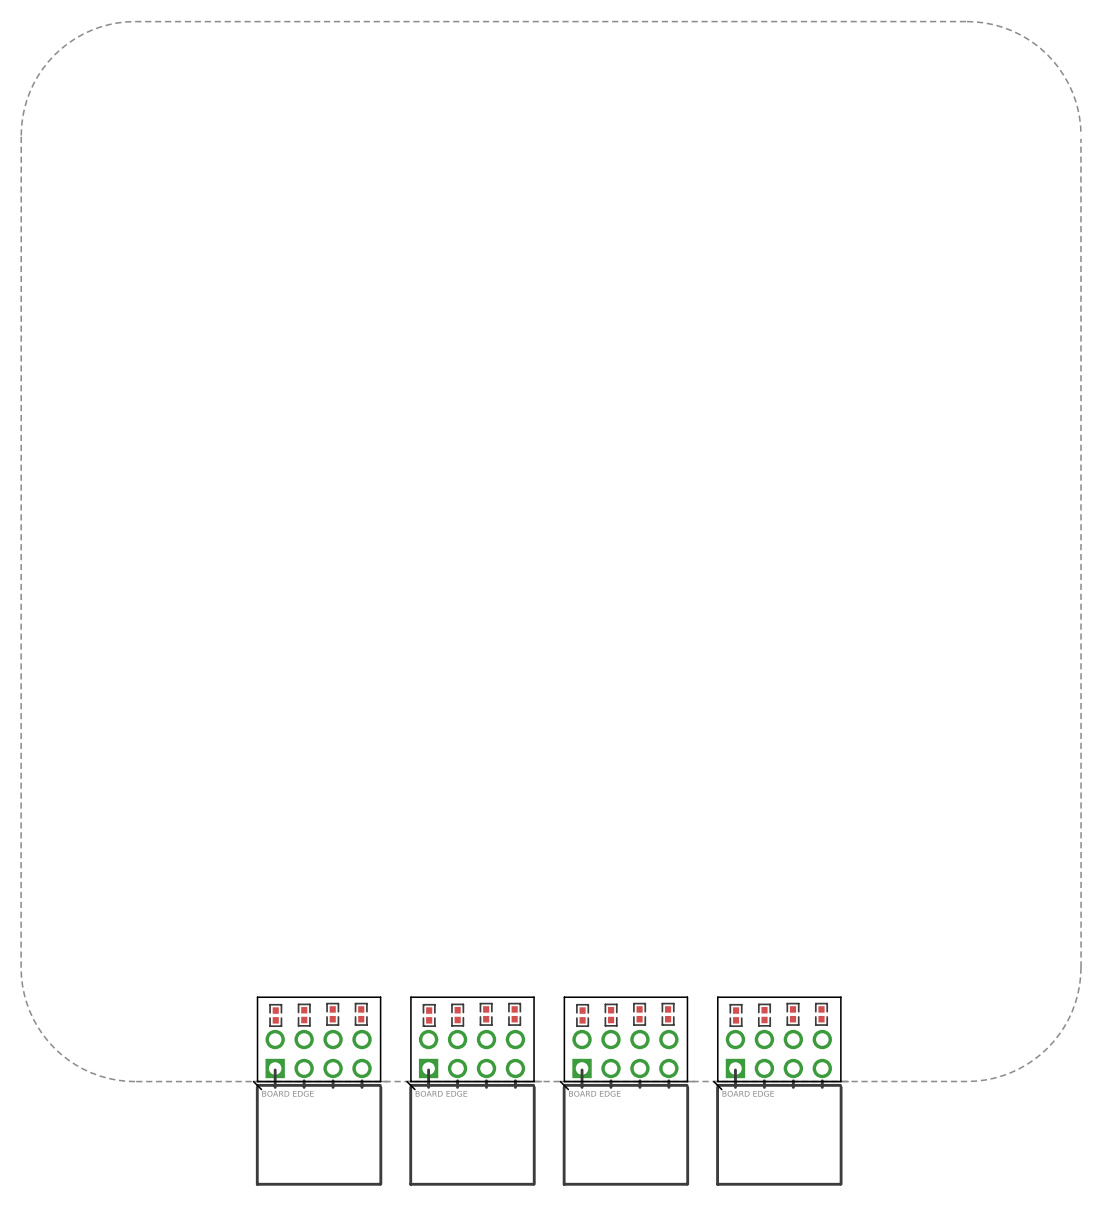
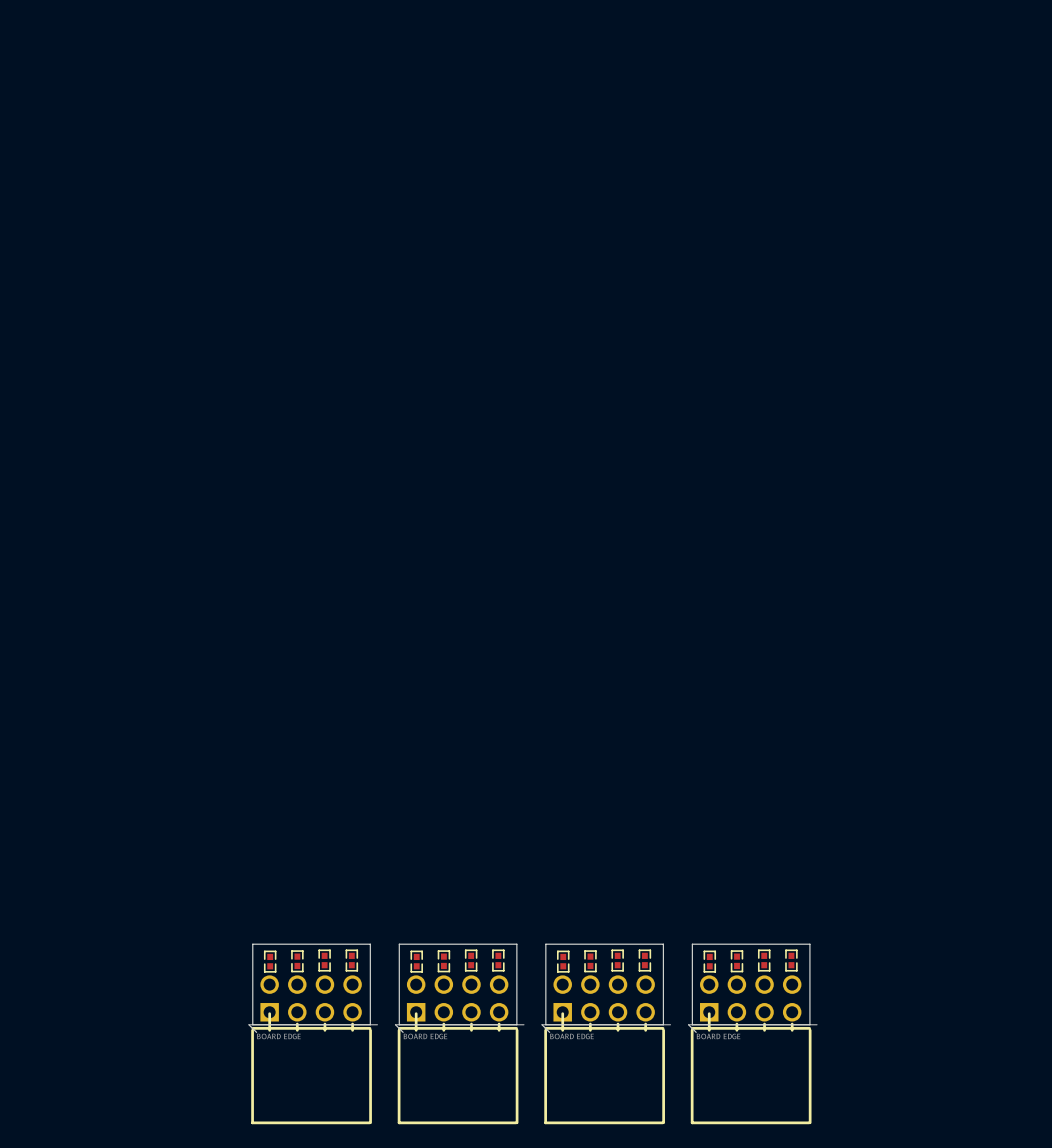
line: (135, 21) (108, 24) (91, 30) (68, 43) (54, 54) (38, 76) (29, 91) (24, 108) (21, 135) (21, 976) (29, 1011) (48, 1041) (75, 1064) (91, 1072) (117, 1080) (967, 1081) (993, 1078) (1010, 1072) (1026, 1064) (1047, 1048) (1064, 1027) (1072, 1011) (1077, 994) (1081, 967) (1080, 138) -> none
line: (135, 21) (984, 22) (1018, 34) (1034, 43) (1053, 61) (1064, 75) (1075, 100) (1081, 135) -> none

